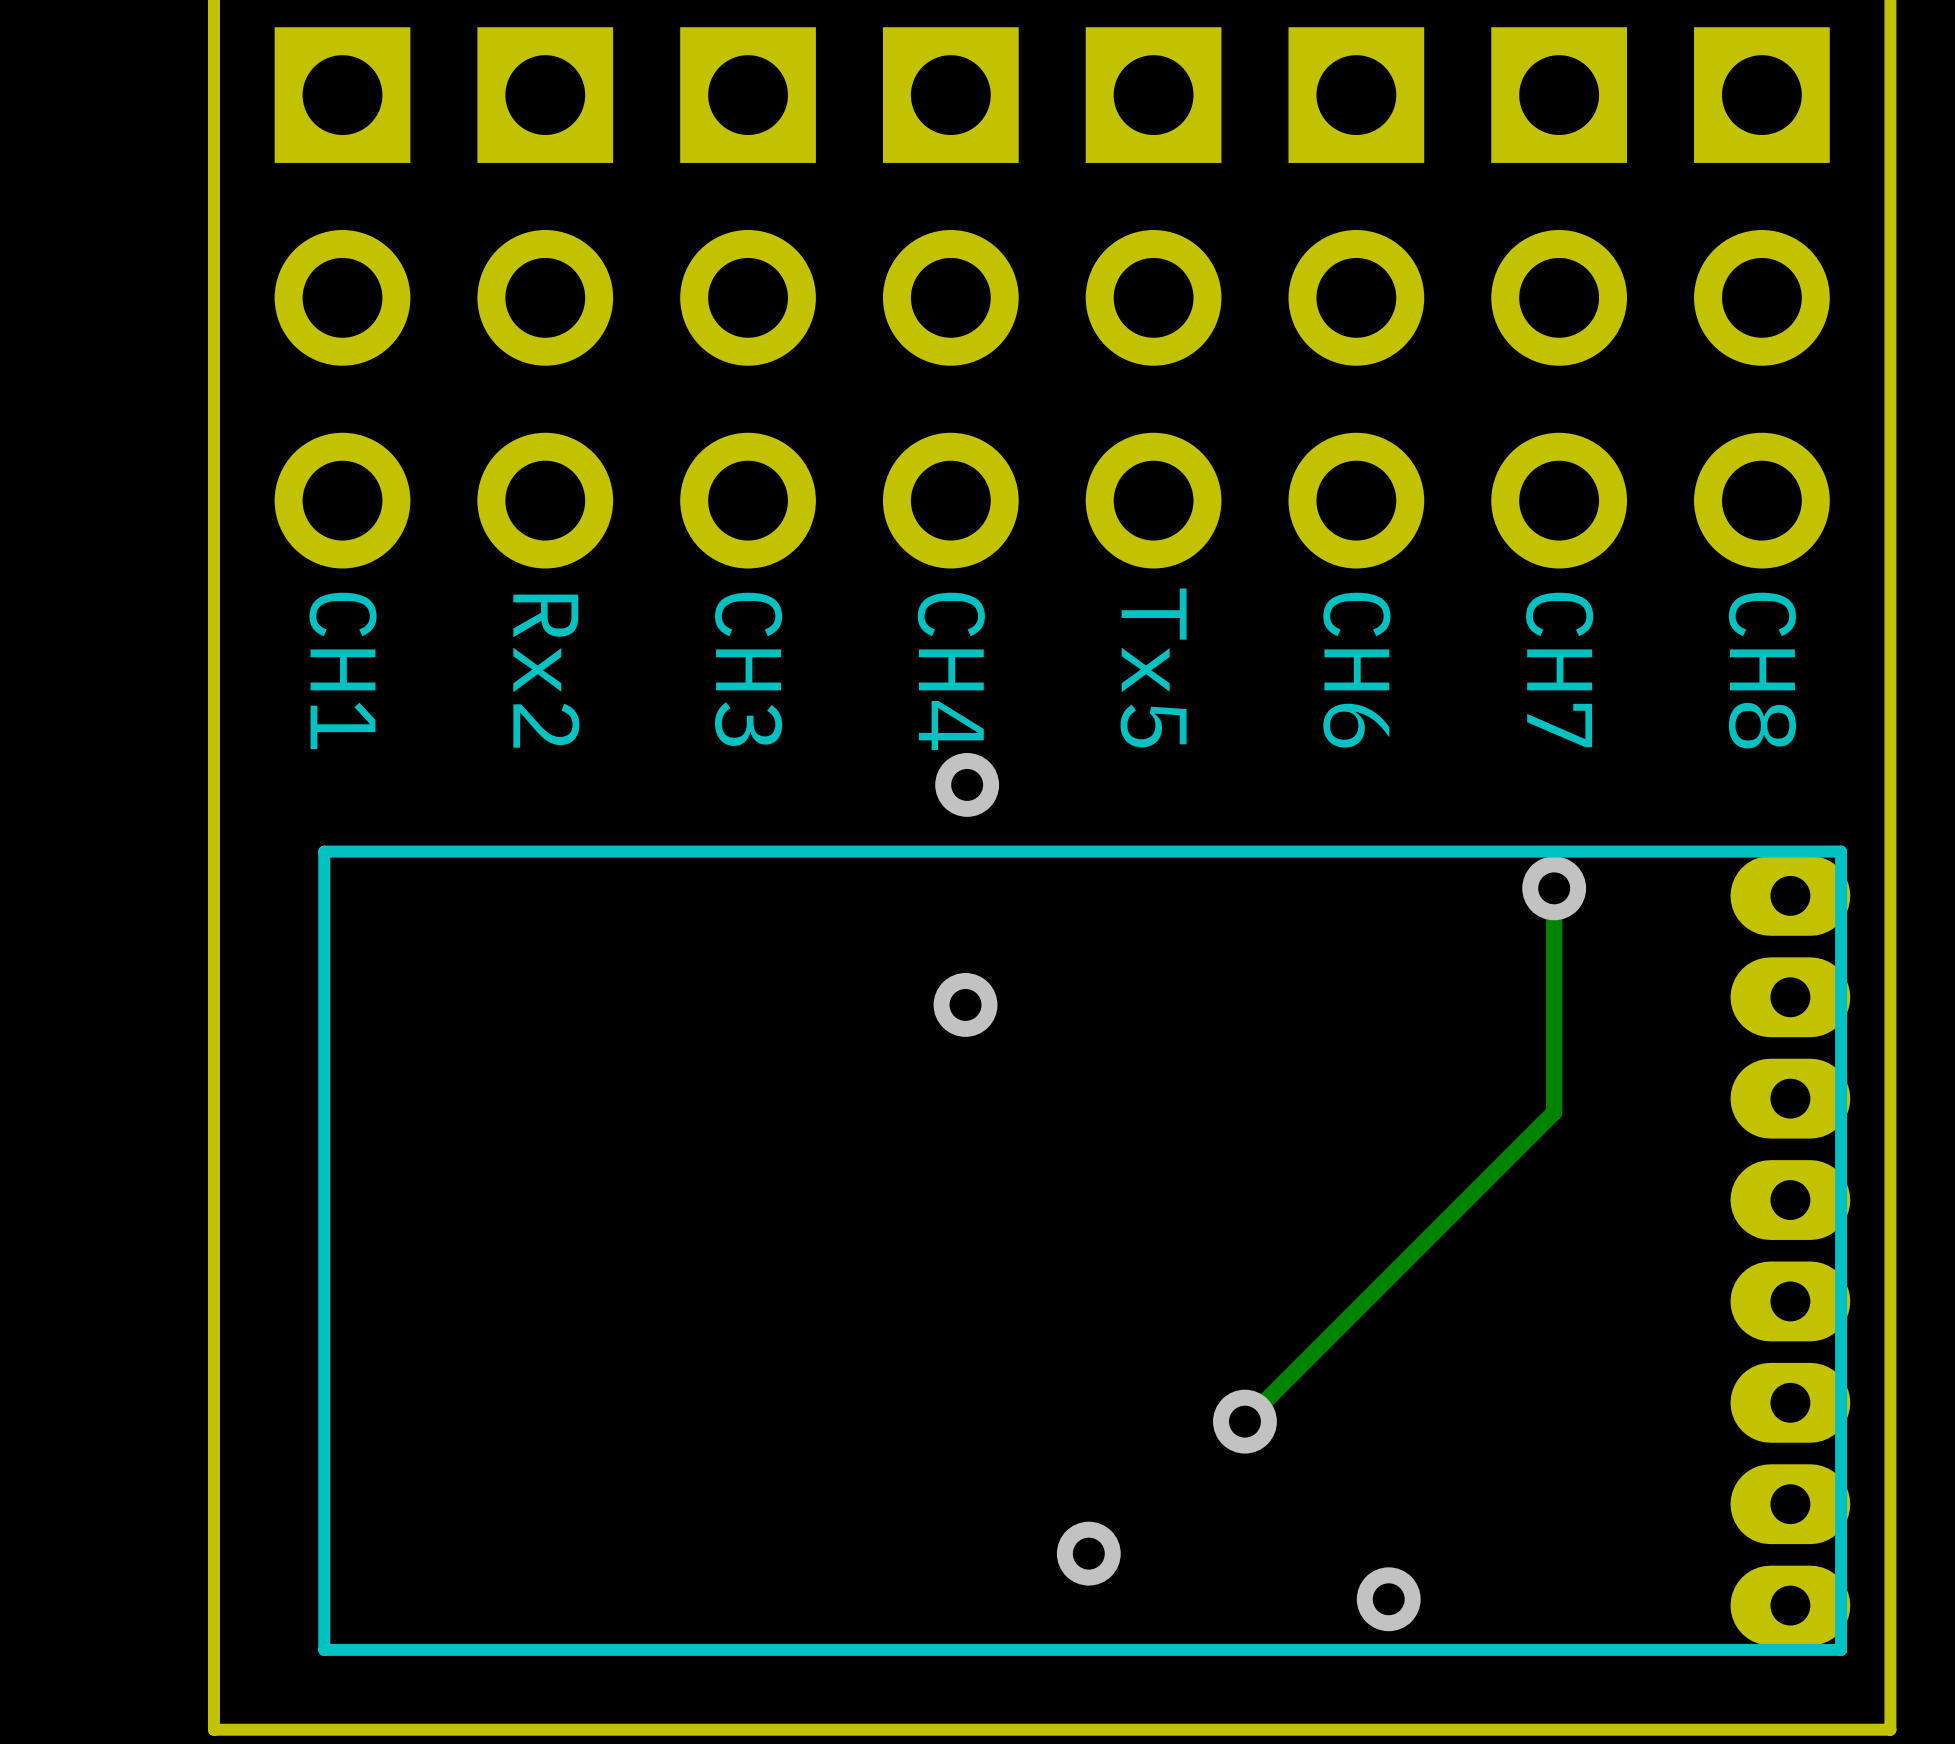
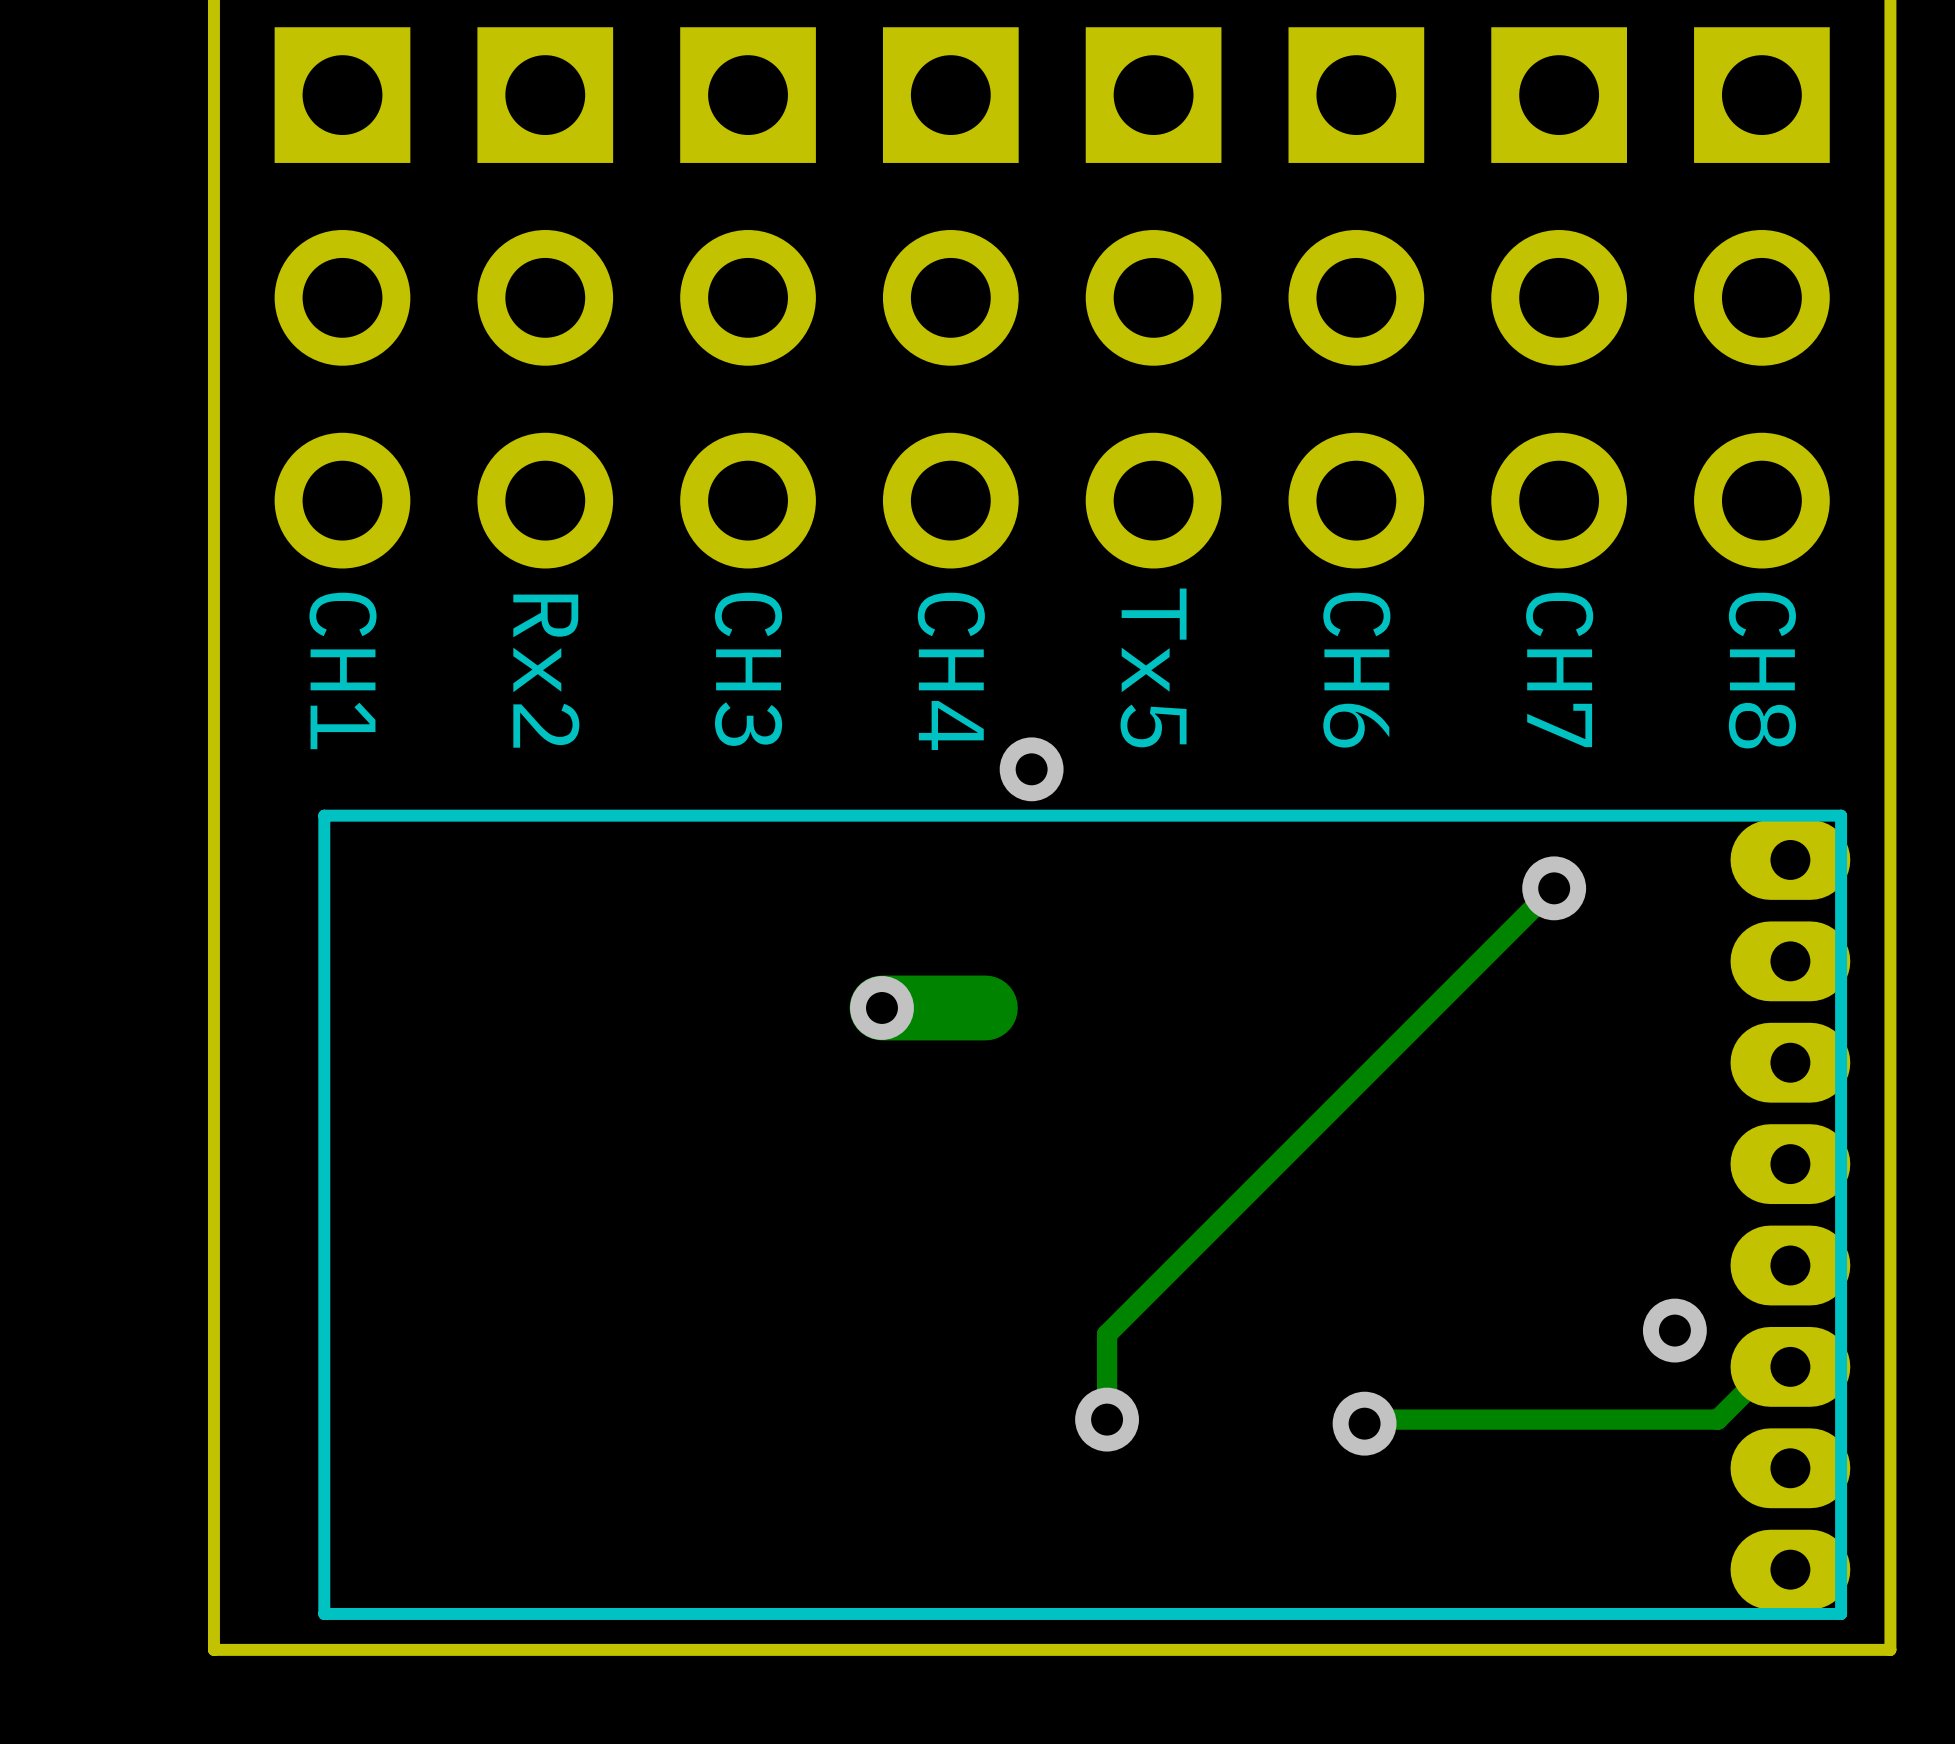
via position: (967, 784) -> (1031, 769)
track: (1554, 888) (1554, 1112) (1244, 1421) -> (1553, 888) (1107, 1334) (1107, 1419)
via position: (965, 1004) -> (881, 1007)
track: none -> (881, 1007) (985, 1007) (987, 1010)
part position: (1084, 1250) -> (1084, 1214)
via: none -> (1674, 1330)
track: none -> (1790, 1366) (1770, 1366) (1717, 1419) (1368, 1419) (1364, 1423)
via: none -> (1107, 1419)
via: (1244, 1421) -> none
via: none -> (1364, 1423)
via: (1088, 1553) -> none
via: (1388, 1599) -> none
board edge: (1890, 1649) (1890, 1729) (213, 1729) (213, 1649) -> (1890, 1649) (213, 1649)

